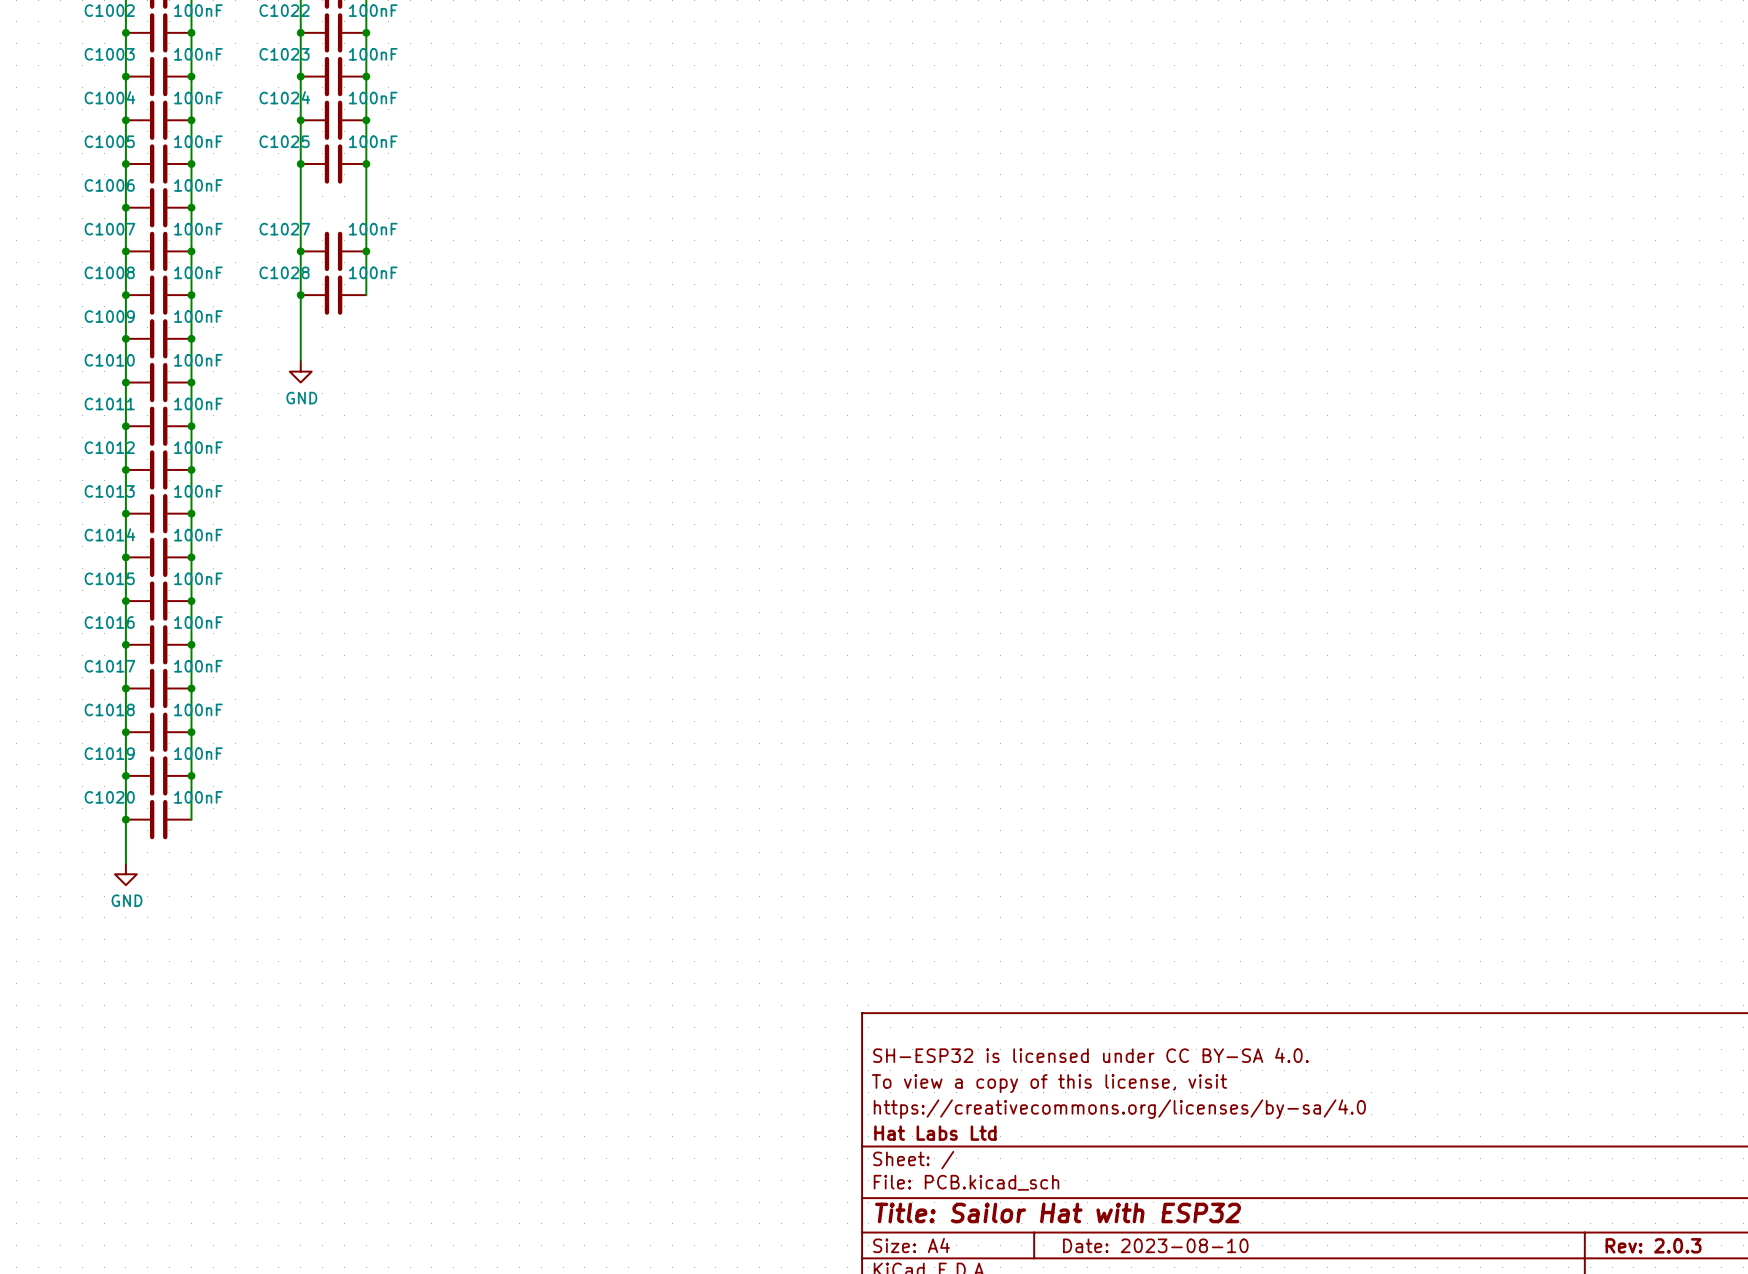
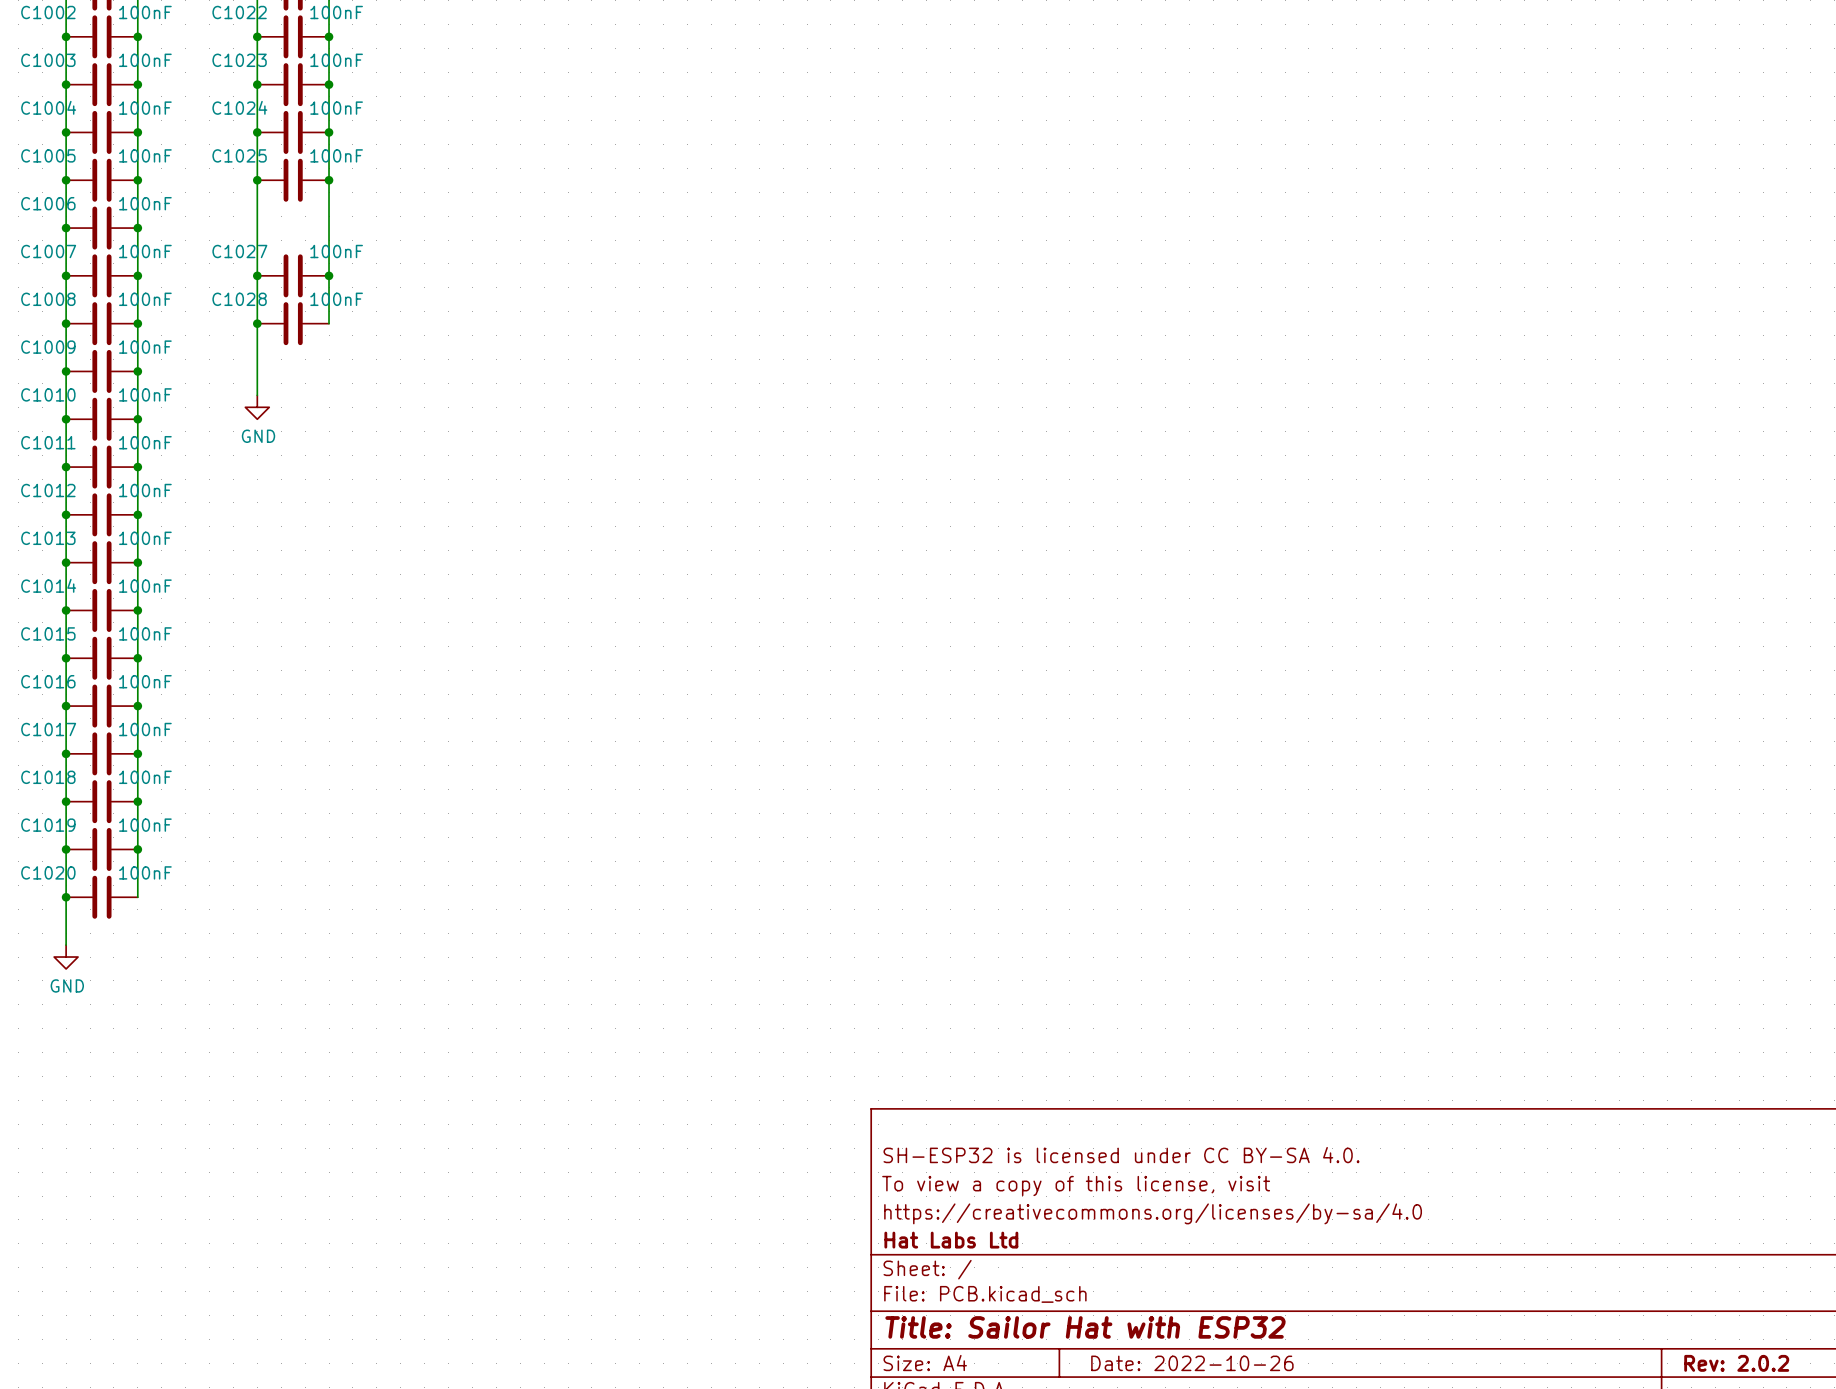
title block: Date: 2023-08-10 (1155, 1245) -> Date: 2022-10-26 (1192, 1363)
title block: Rev: 2.0.3 (1653, 1245) -> Rev: 2.0.2 (1736, 1363)

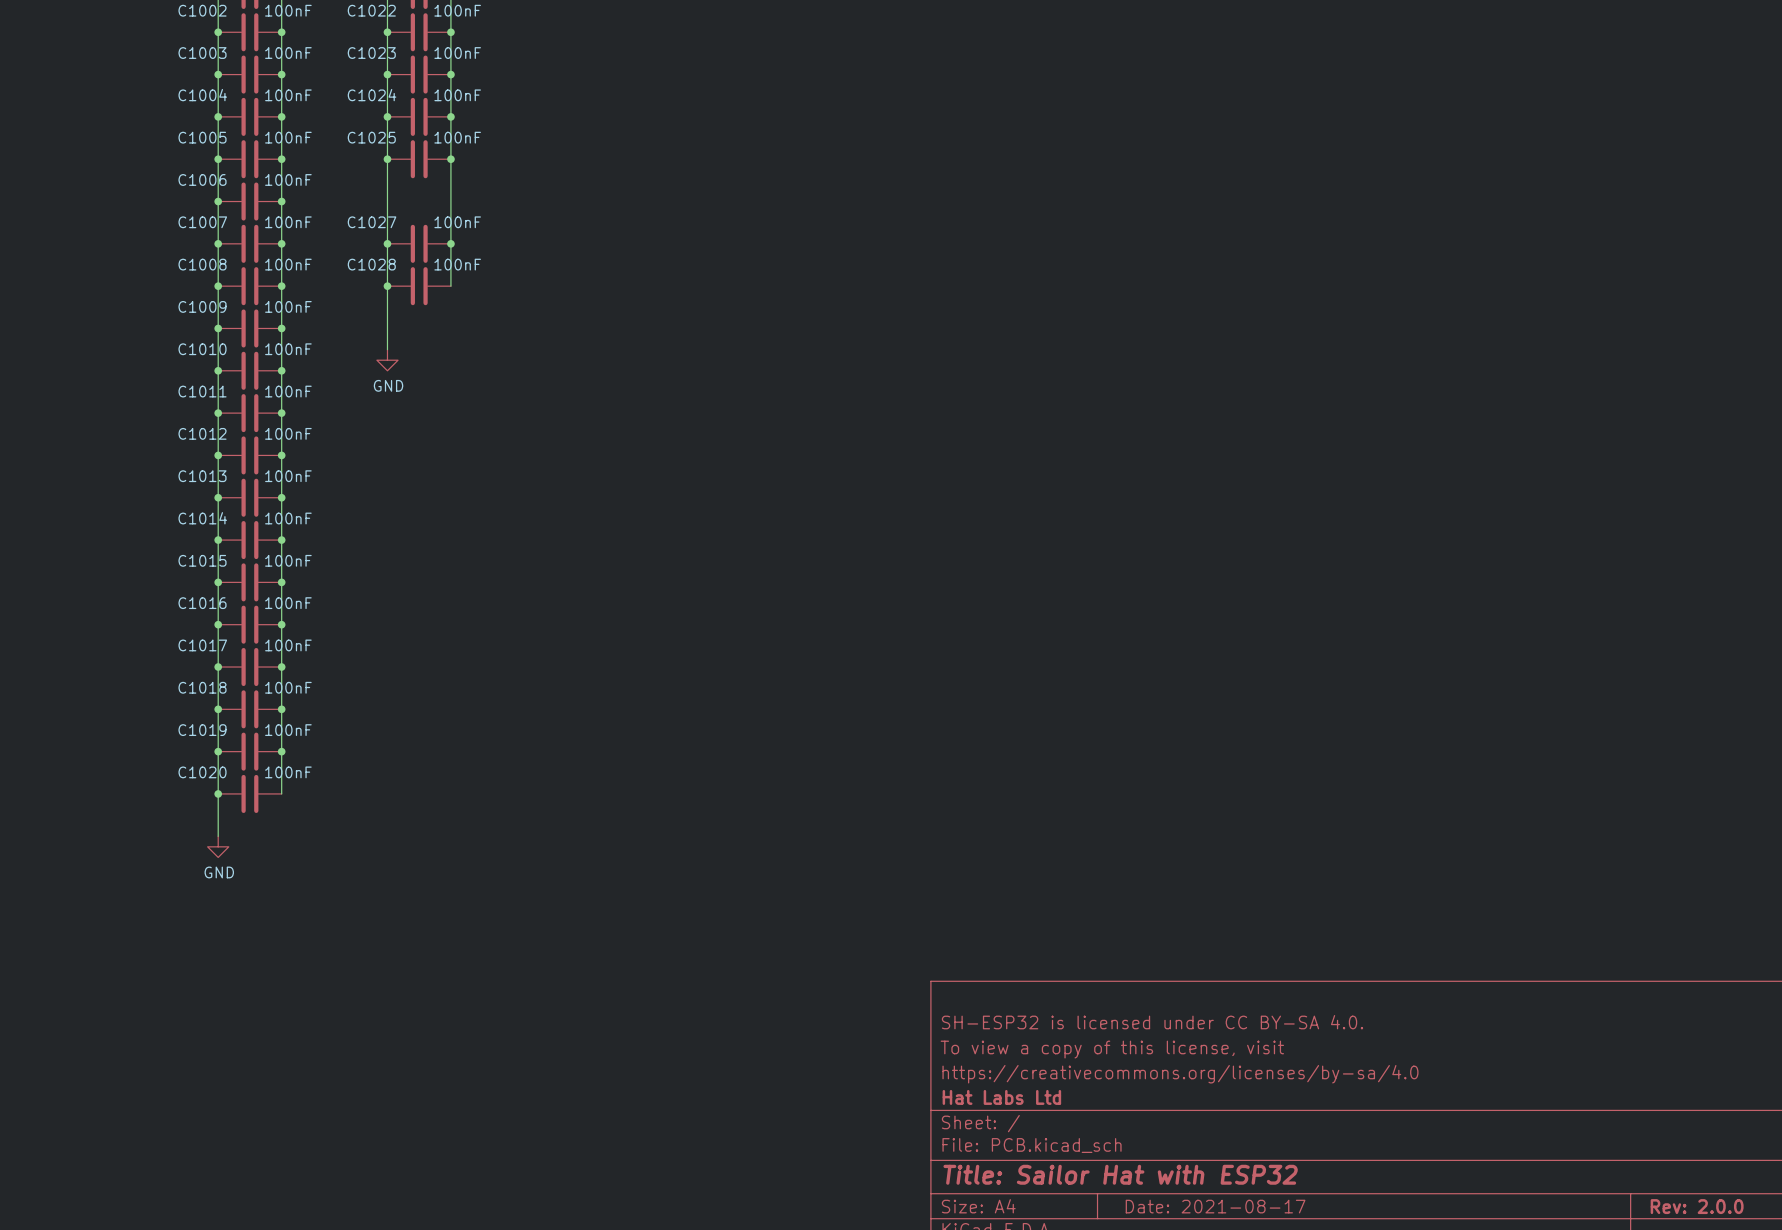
title block: Date: 2022-10-26 (1192, 1363) -> Date: 2021-08-17 (1215, 1206)
title block: Rev: 2.0.2 (1736, 1363) -> Rev: 2.0.0 (1697, 1206)

